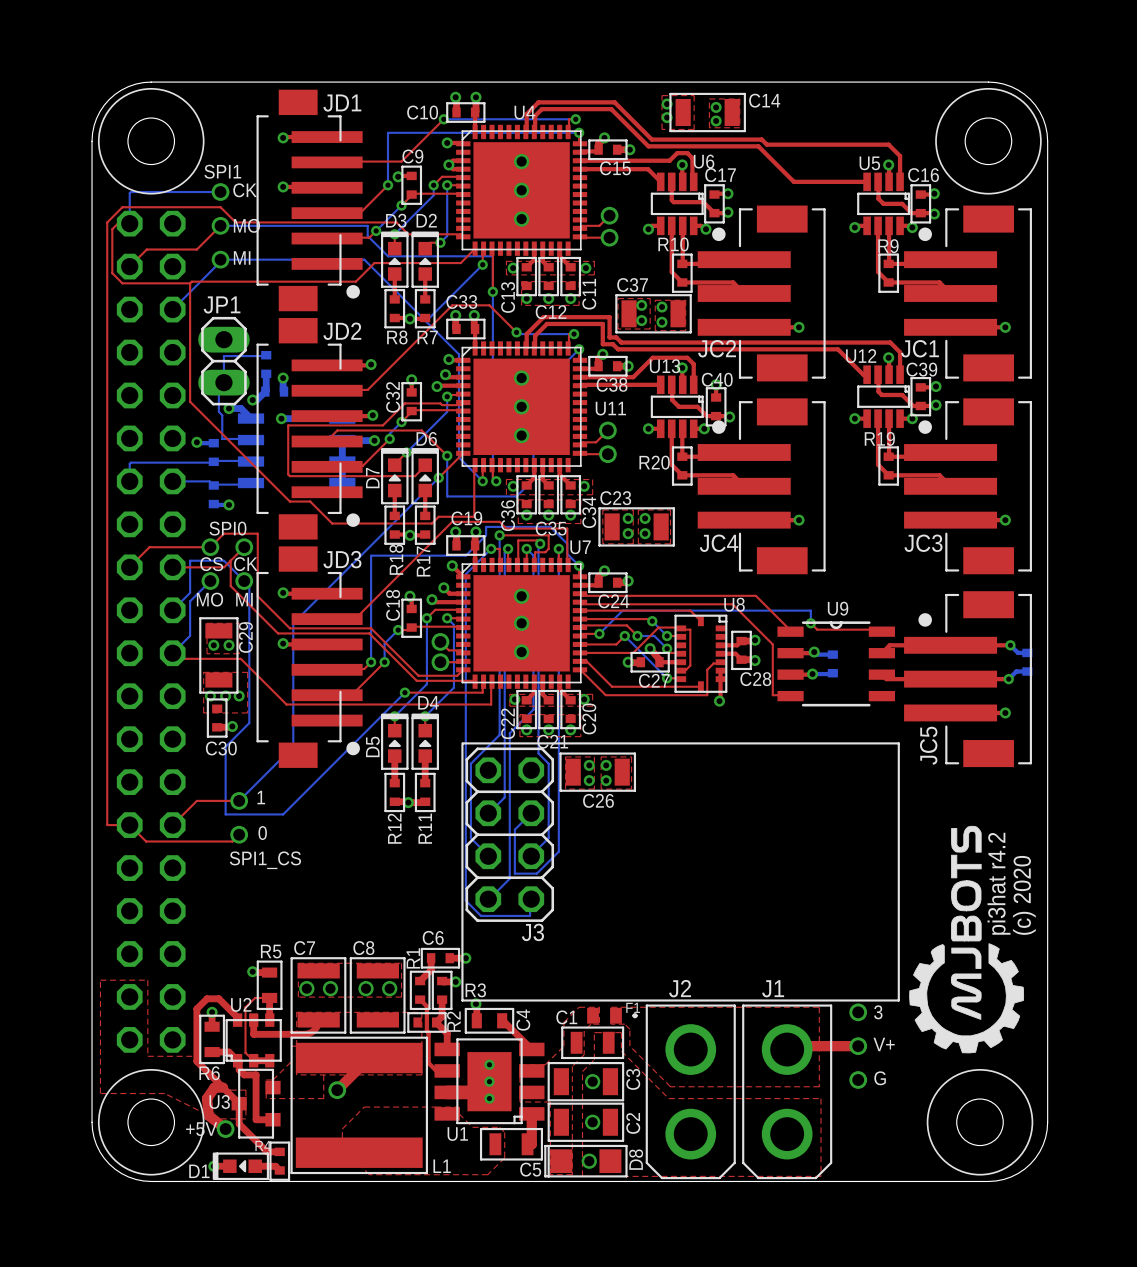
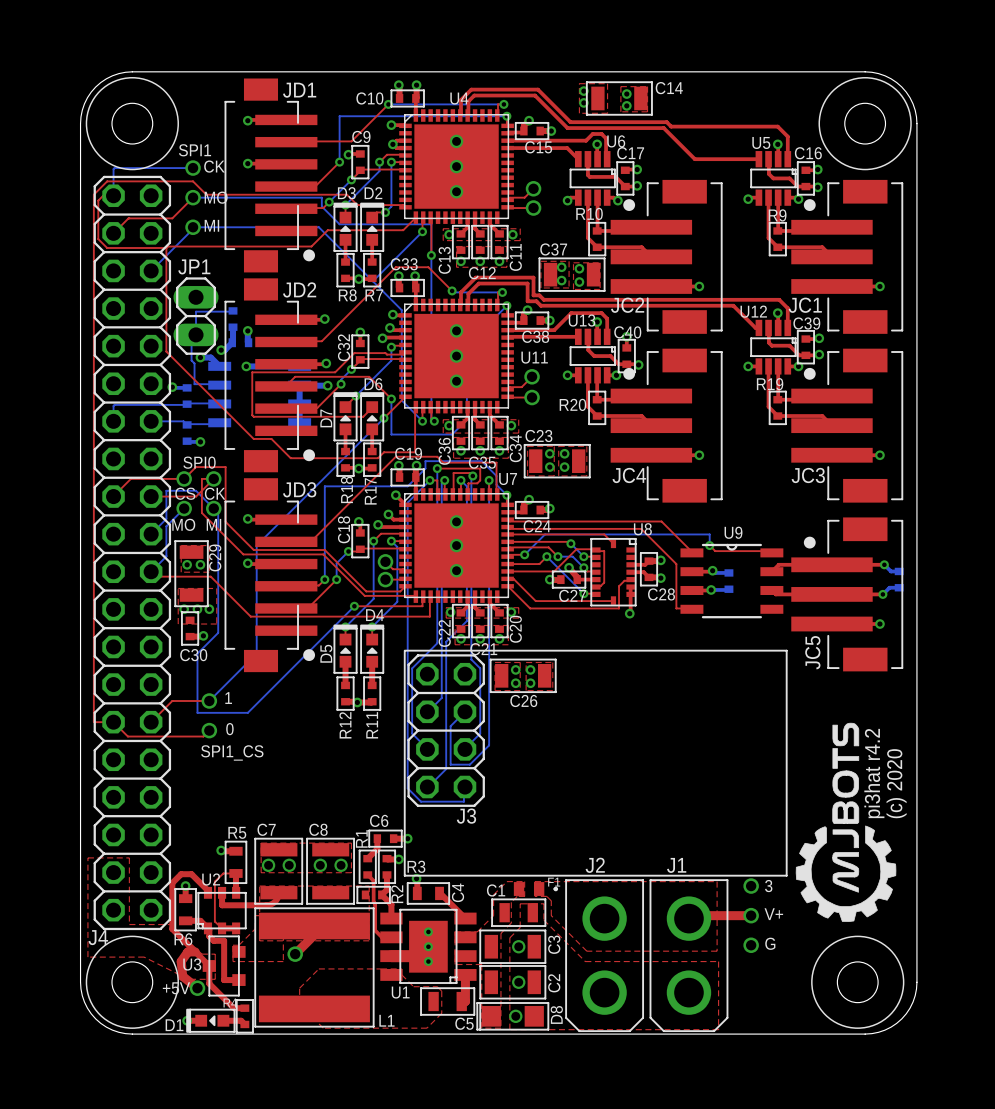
top track: none -> (213, 478) (201, 478) (201, 490)
J4 side: bottom (151, 631) -> top (132, 552)

